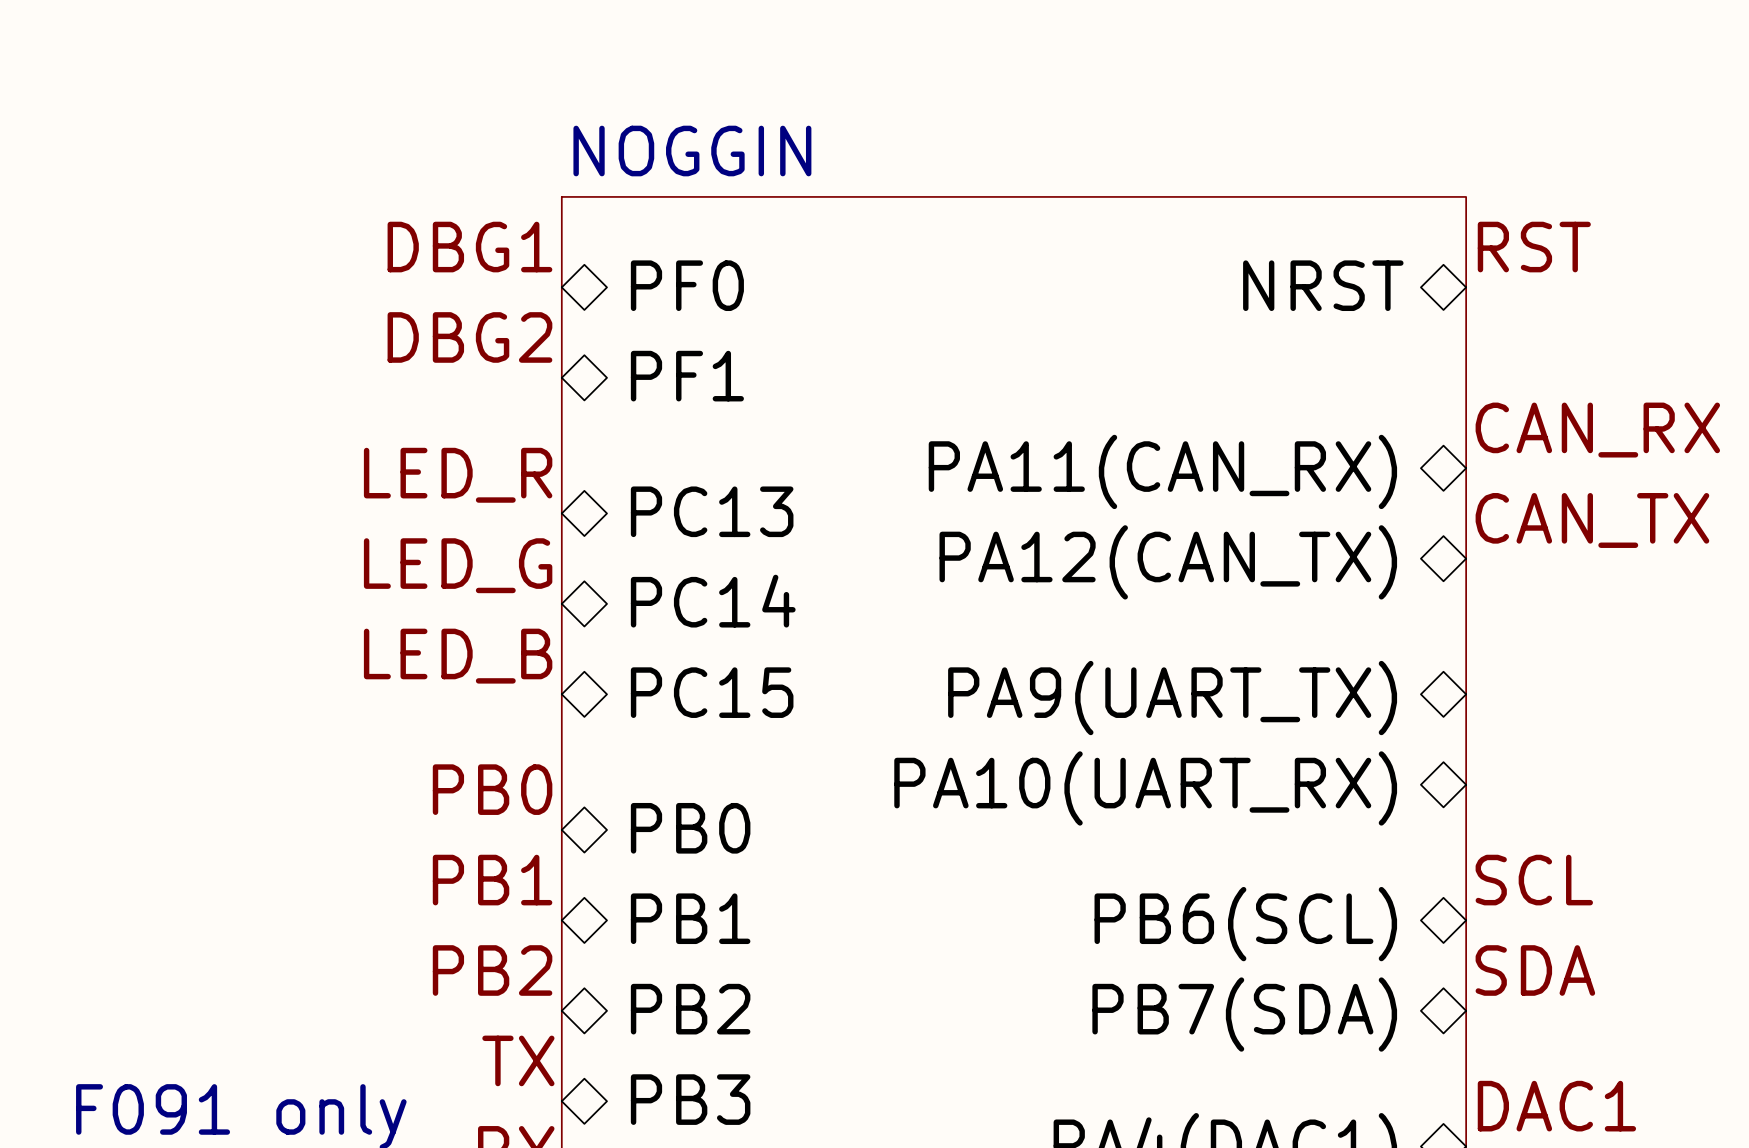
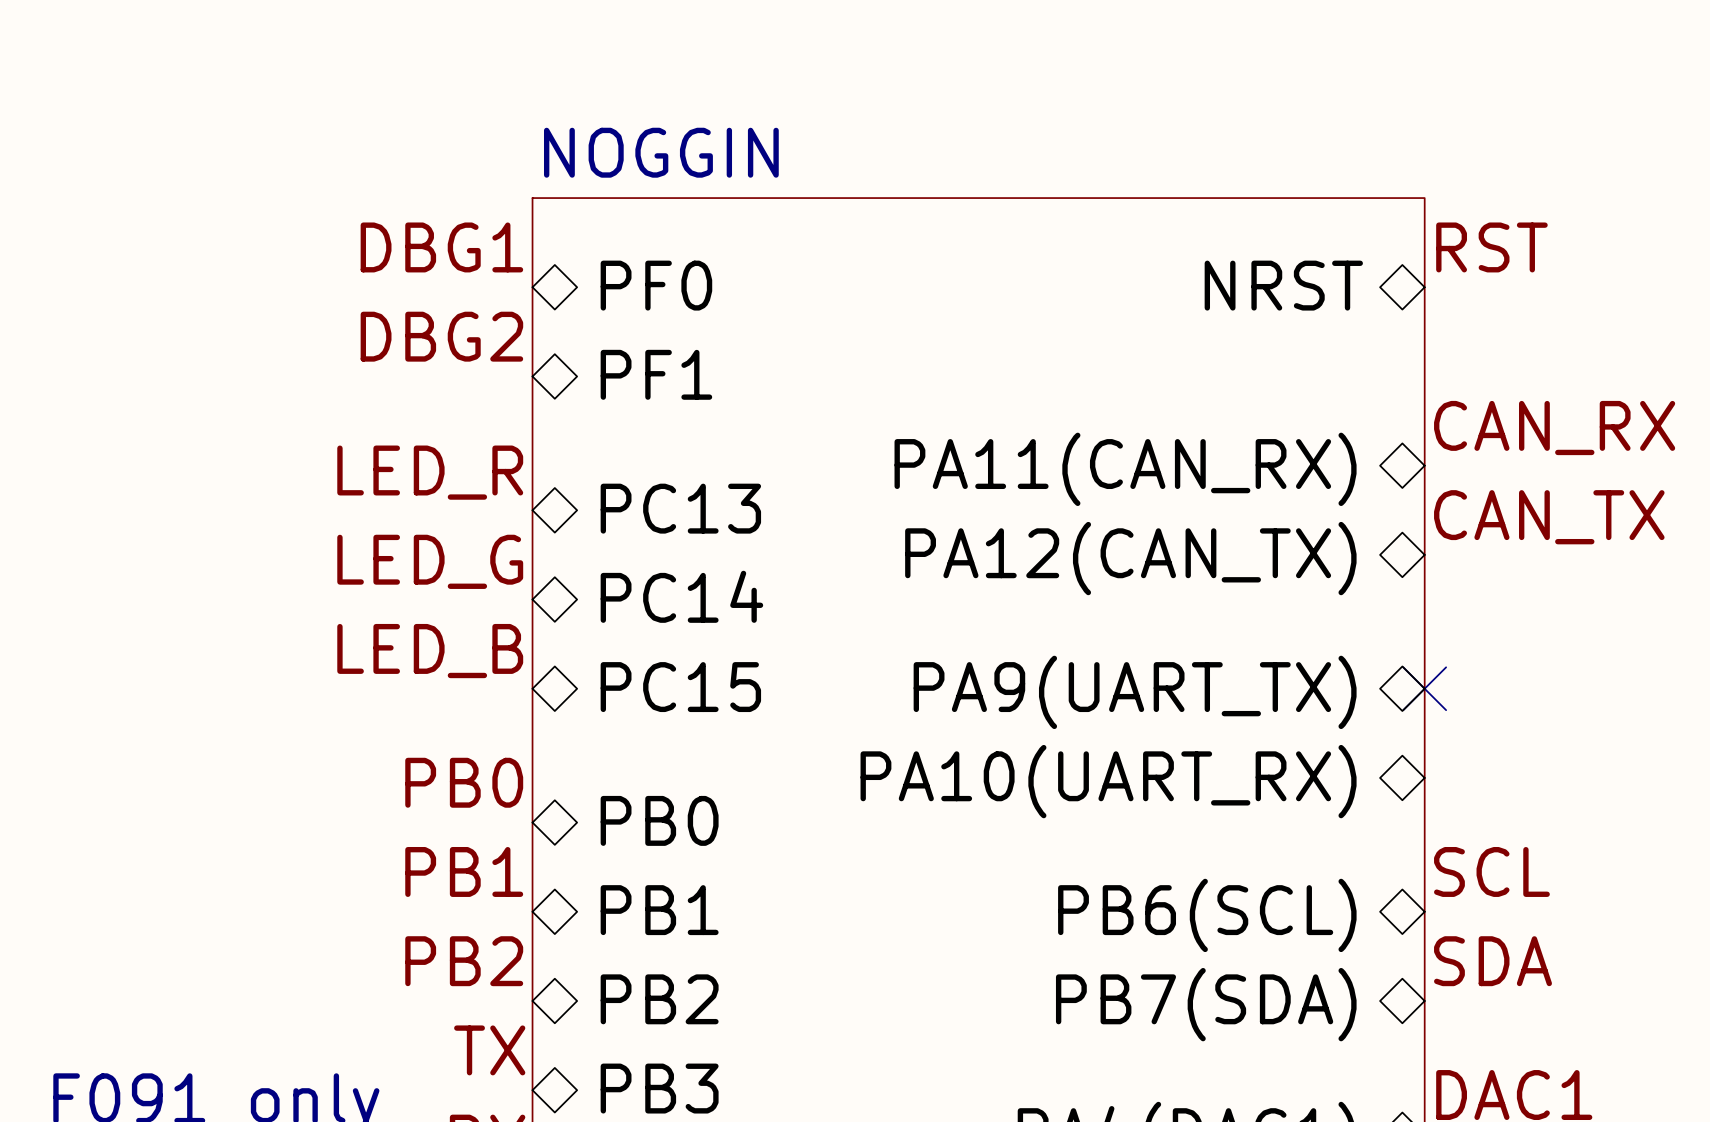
no-connect mark: none -> (1424, 688)

